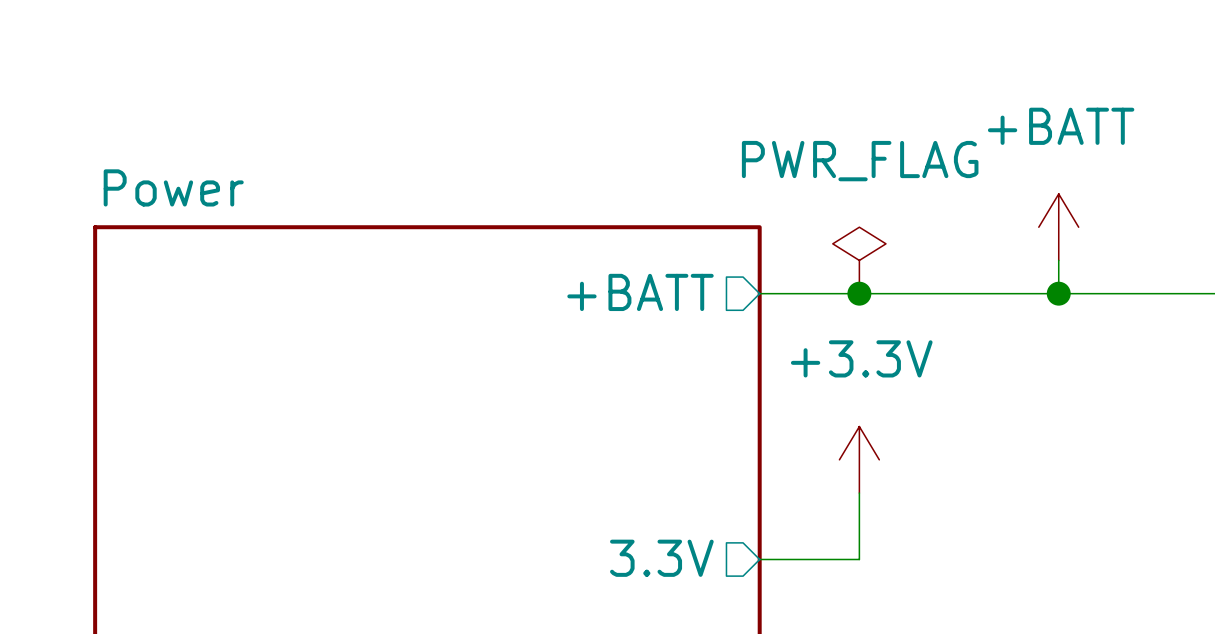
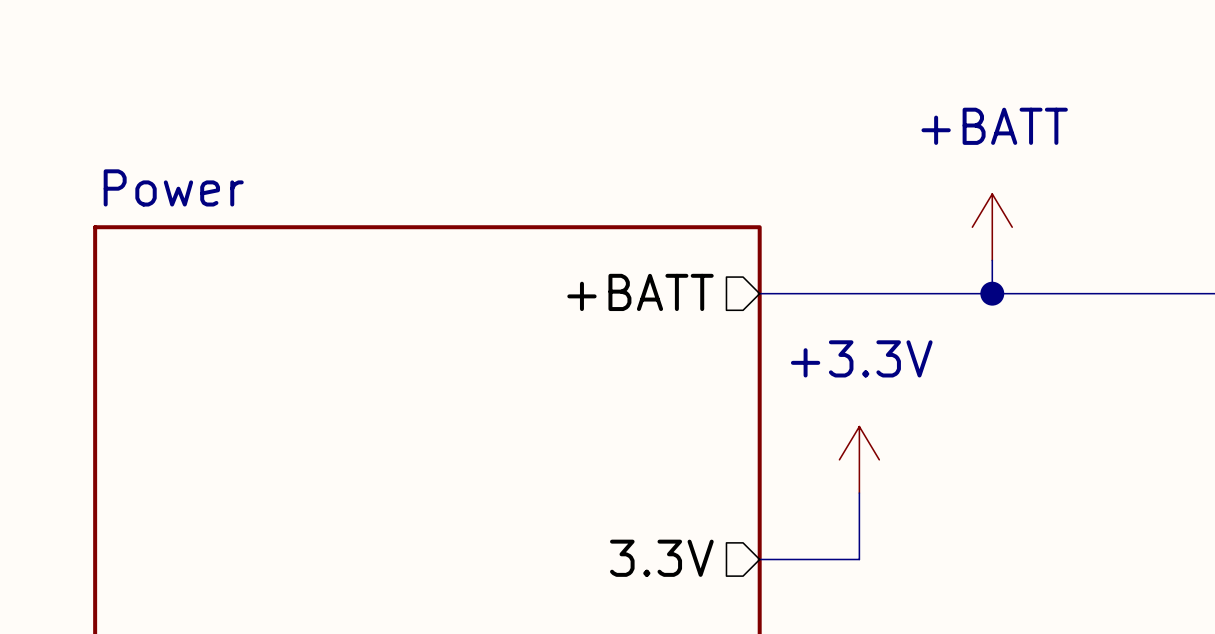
power symbol position: +BATT (1058, 227) -> +BATT (992, 227)
power symbol: PWR_FLAG (859, 260) -> none
wire: (1058, 260) (1058, 293) -> (992, 260) (992, 293)
junction: (859, 293) -> none
junction: none -> (992, 293)
junction: (1058, 293) -> none

